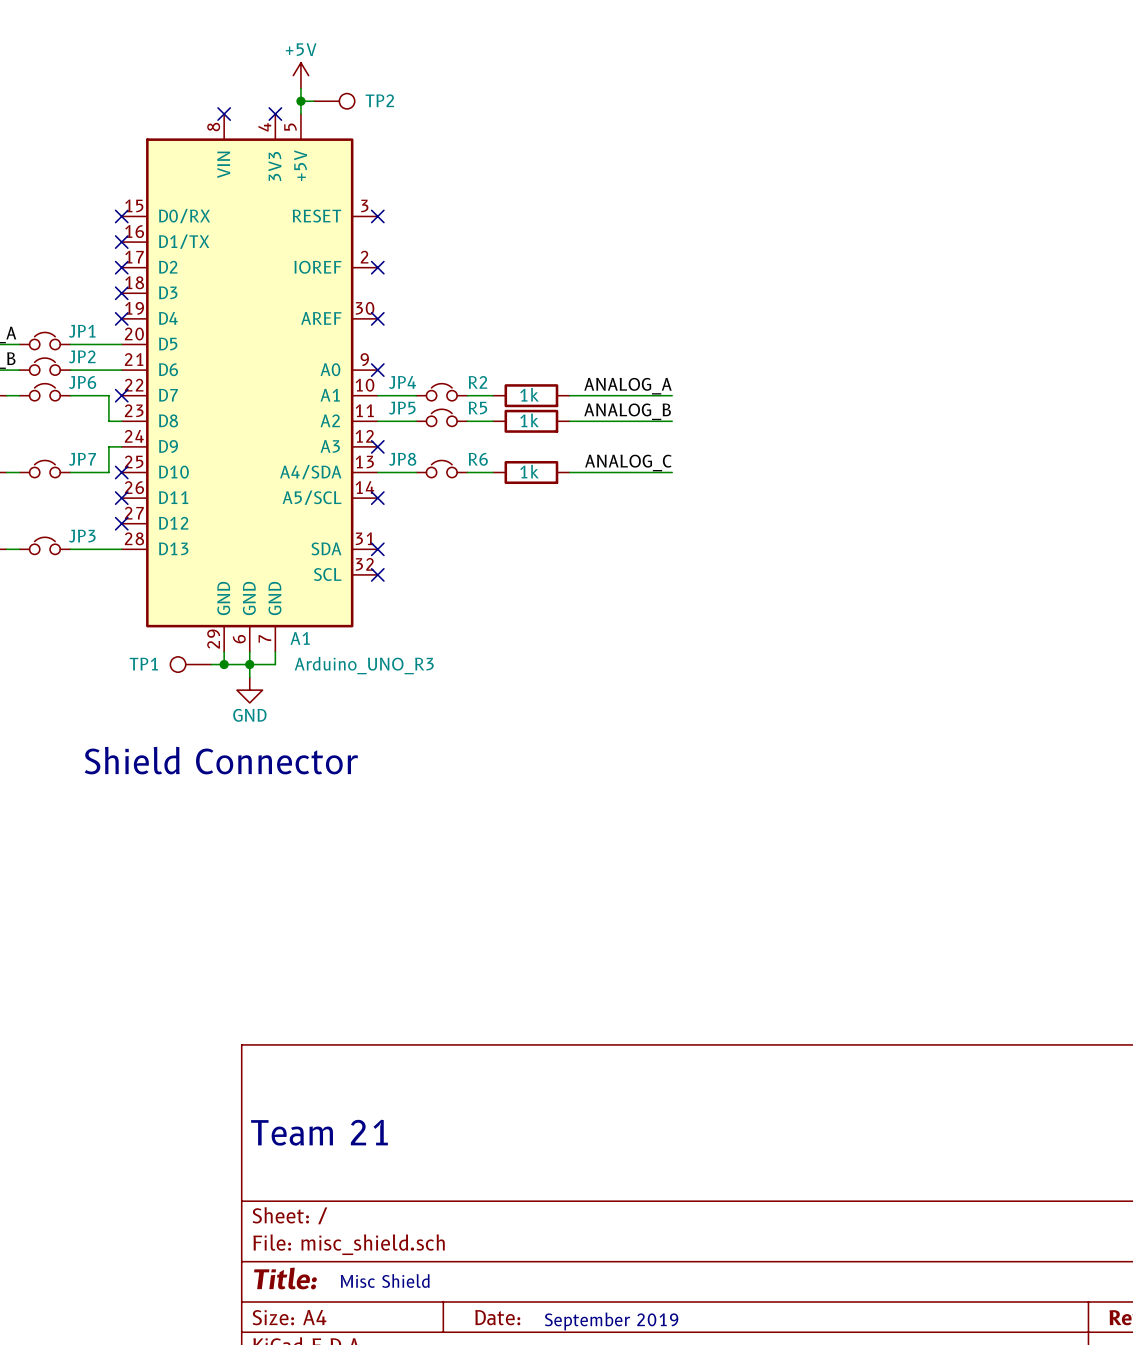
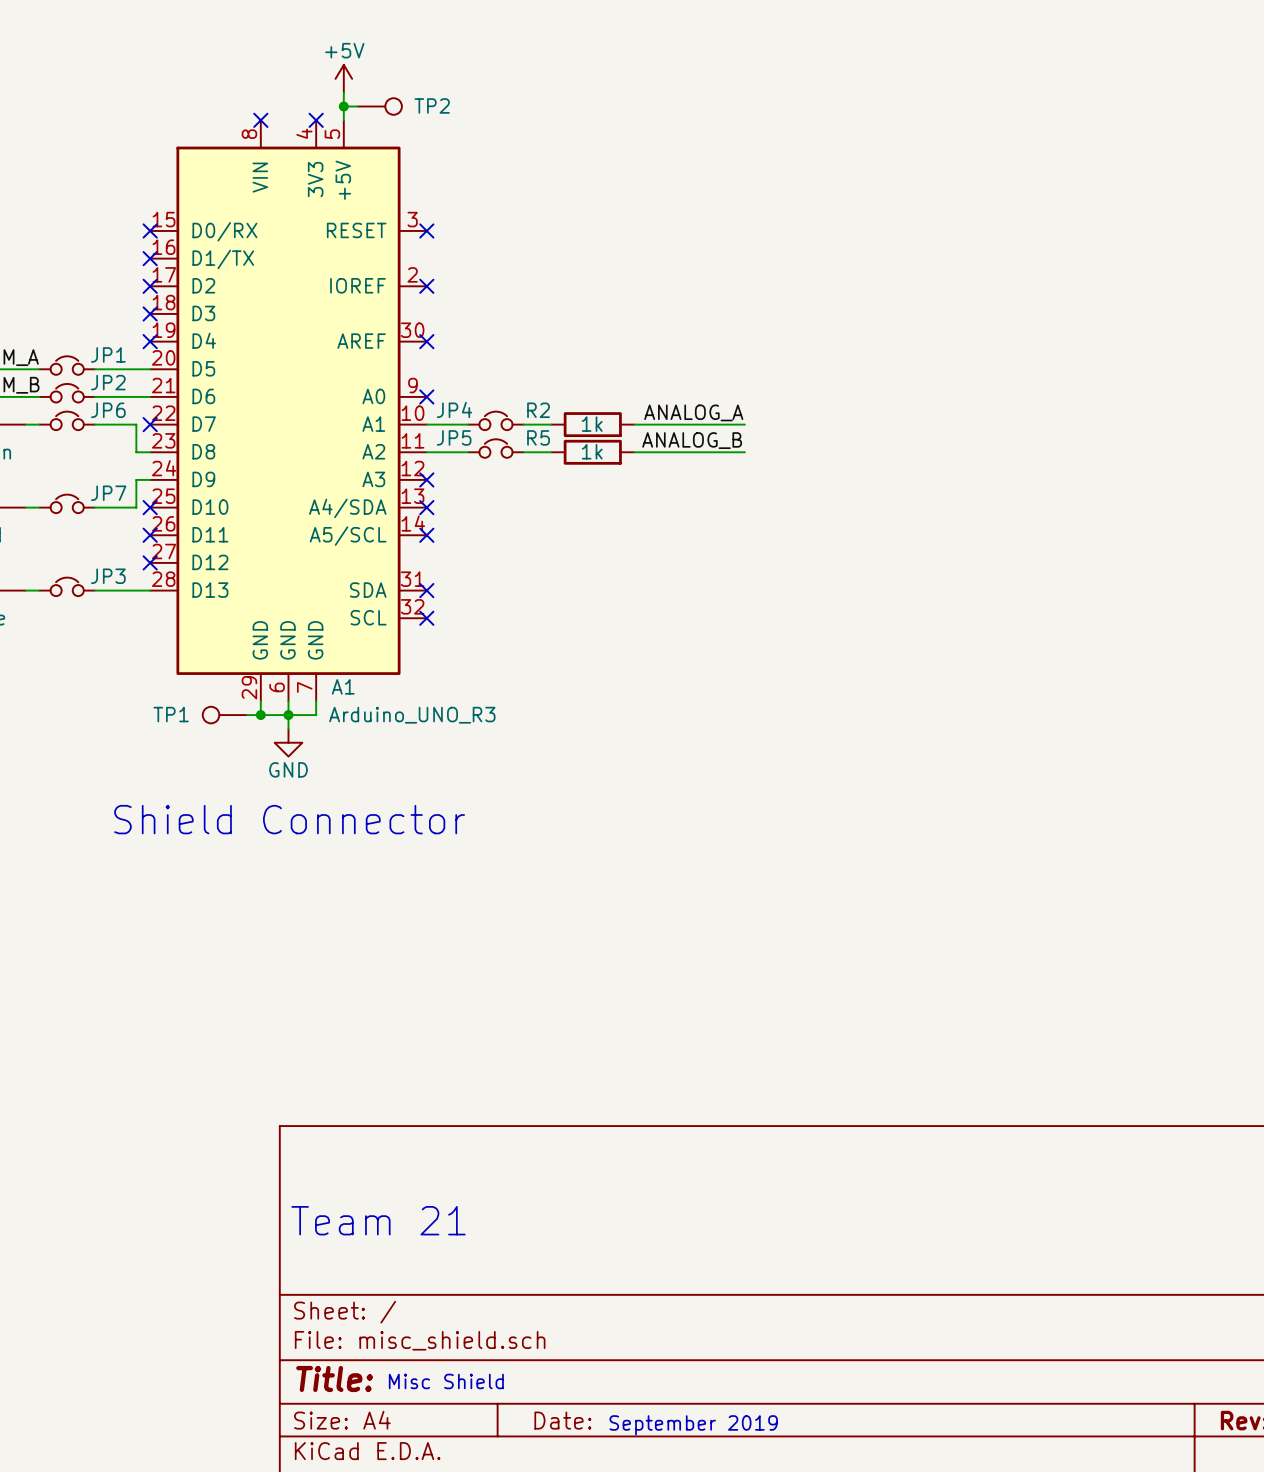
label: ANALOG_C (628, 462) -> none
JP8: (441, 469) -> none
wire: (377, 472) (416, 472) -> none
no-connect mark: none -> (426, 507)
wire: (467, 472) (492, 472) -> none
R6: 1k (531, 472) -> none
wire: (569, 472) (672, 472) -> none

